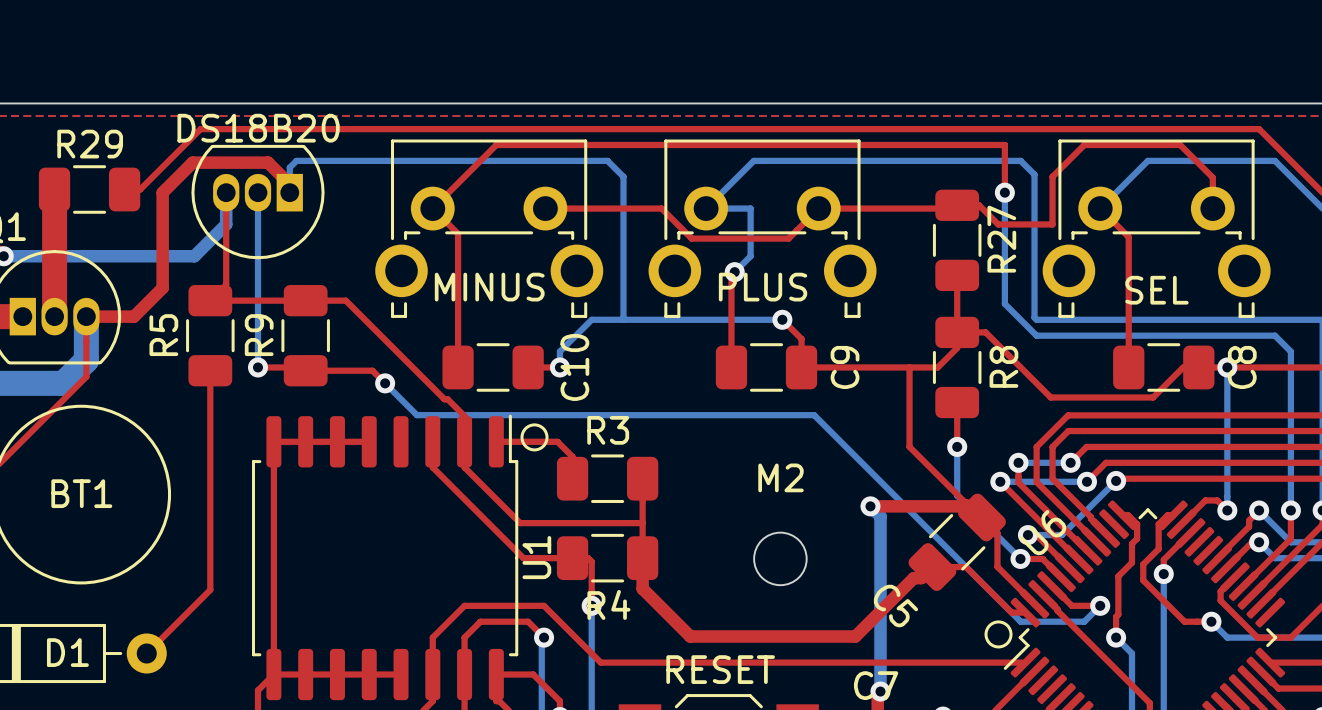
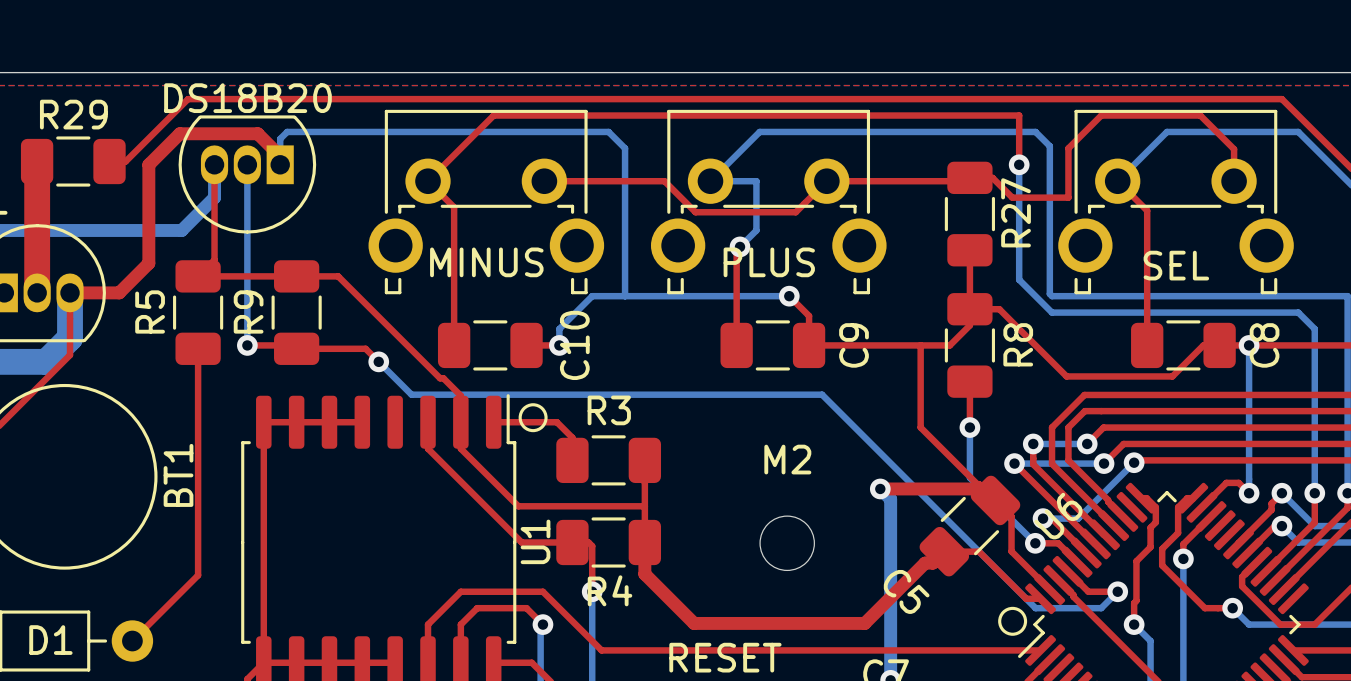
BT1 name rotation: 0° (81, 493) -> 90° counterclockwise (178, 475)
BT1 name position: BT1 (81, 493) -> BT1 (178, 475)

